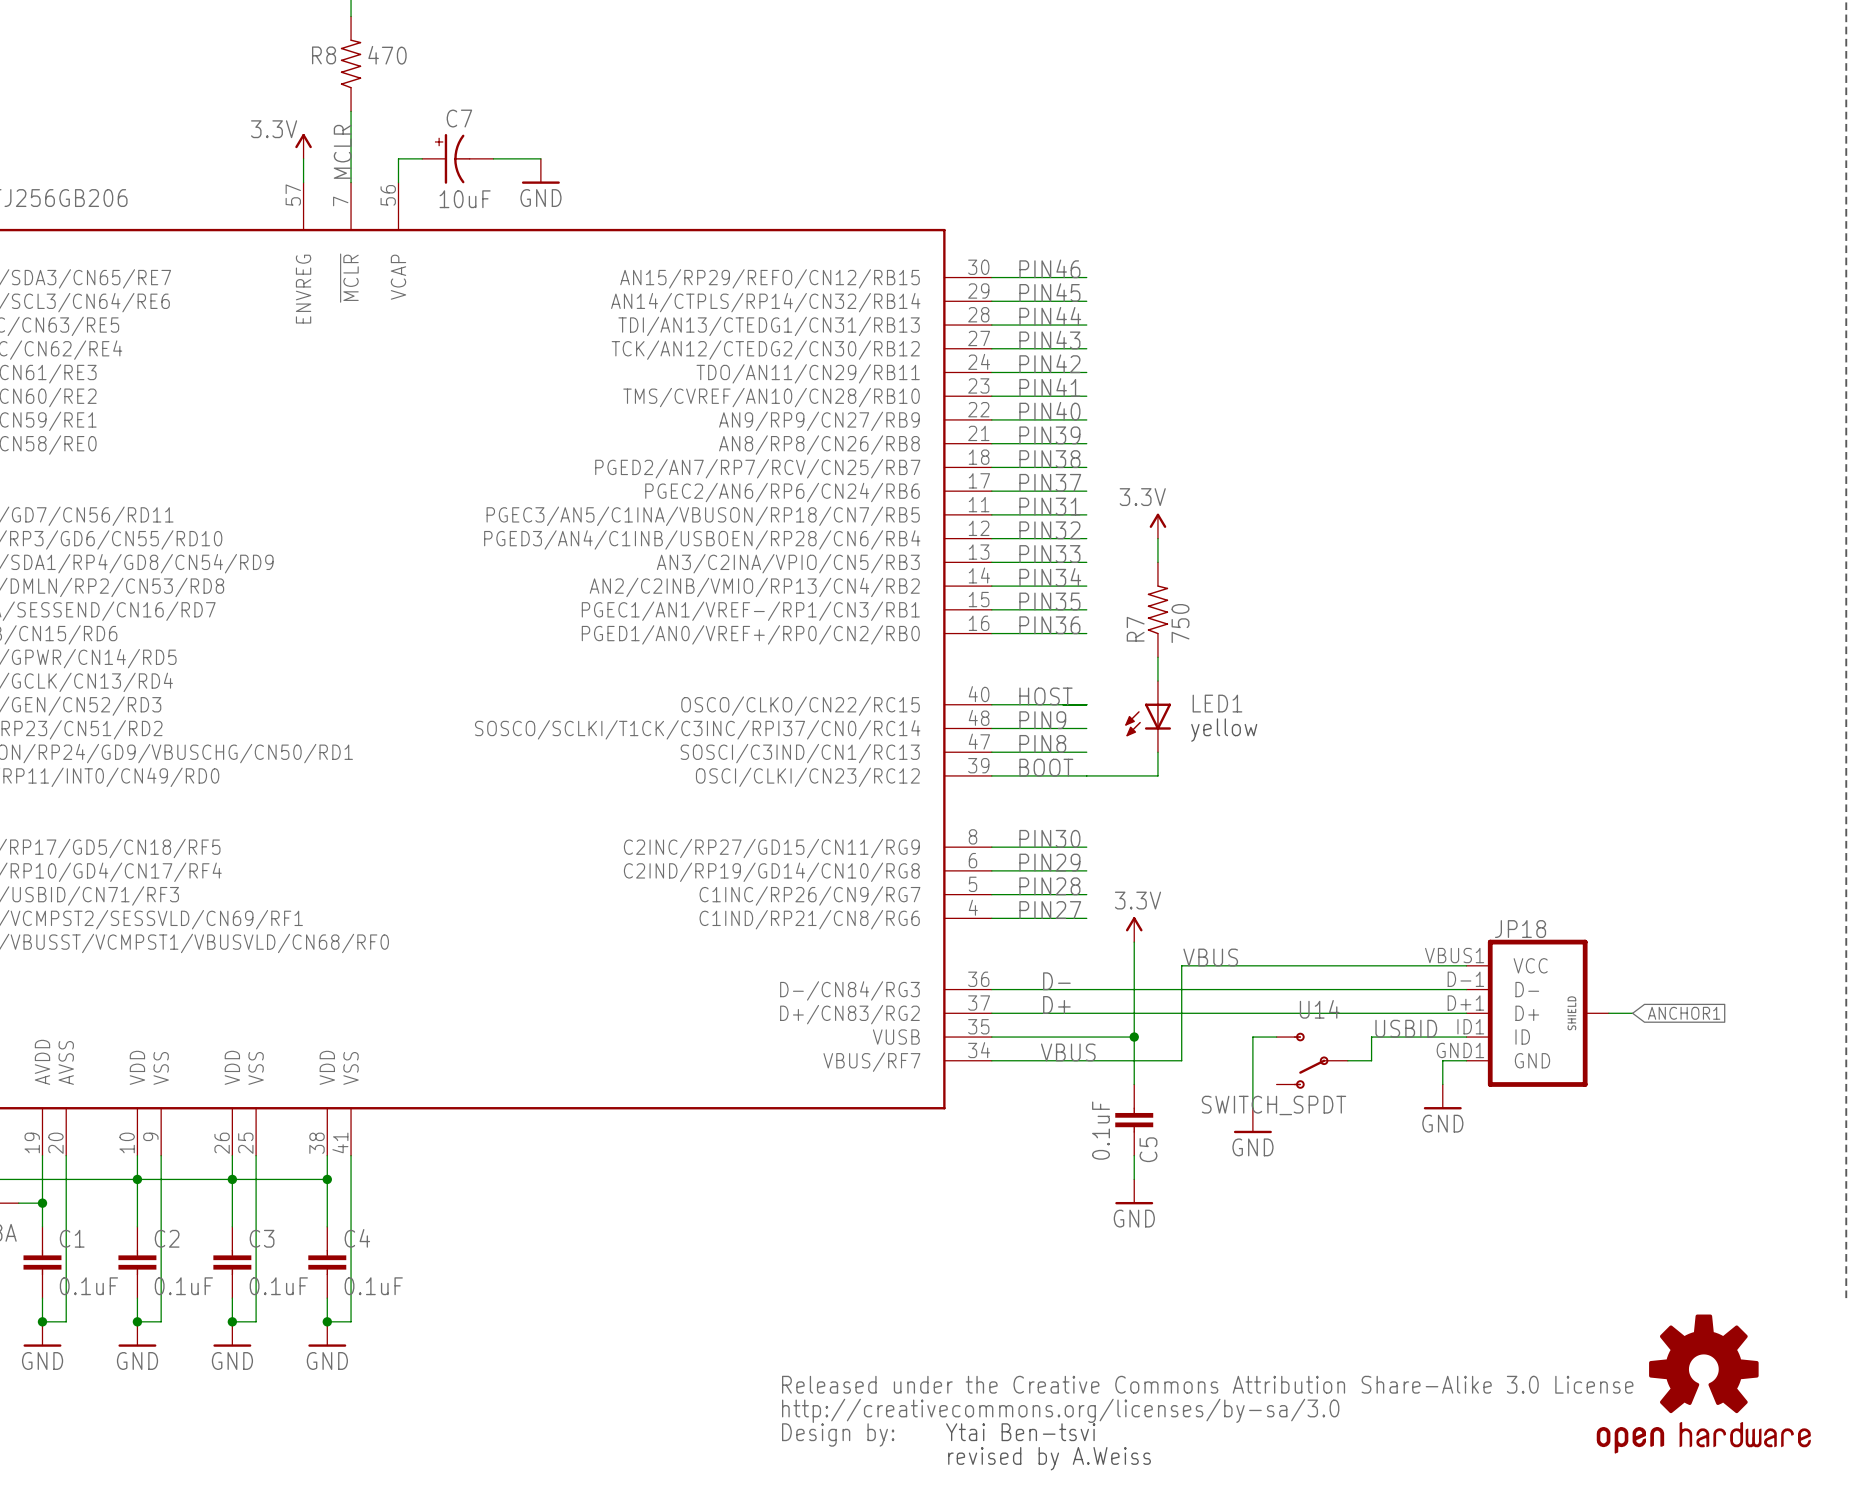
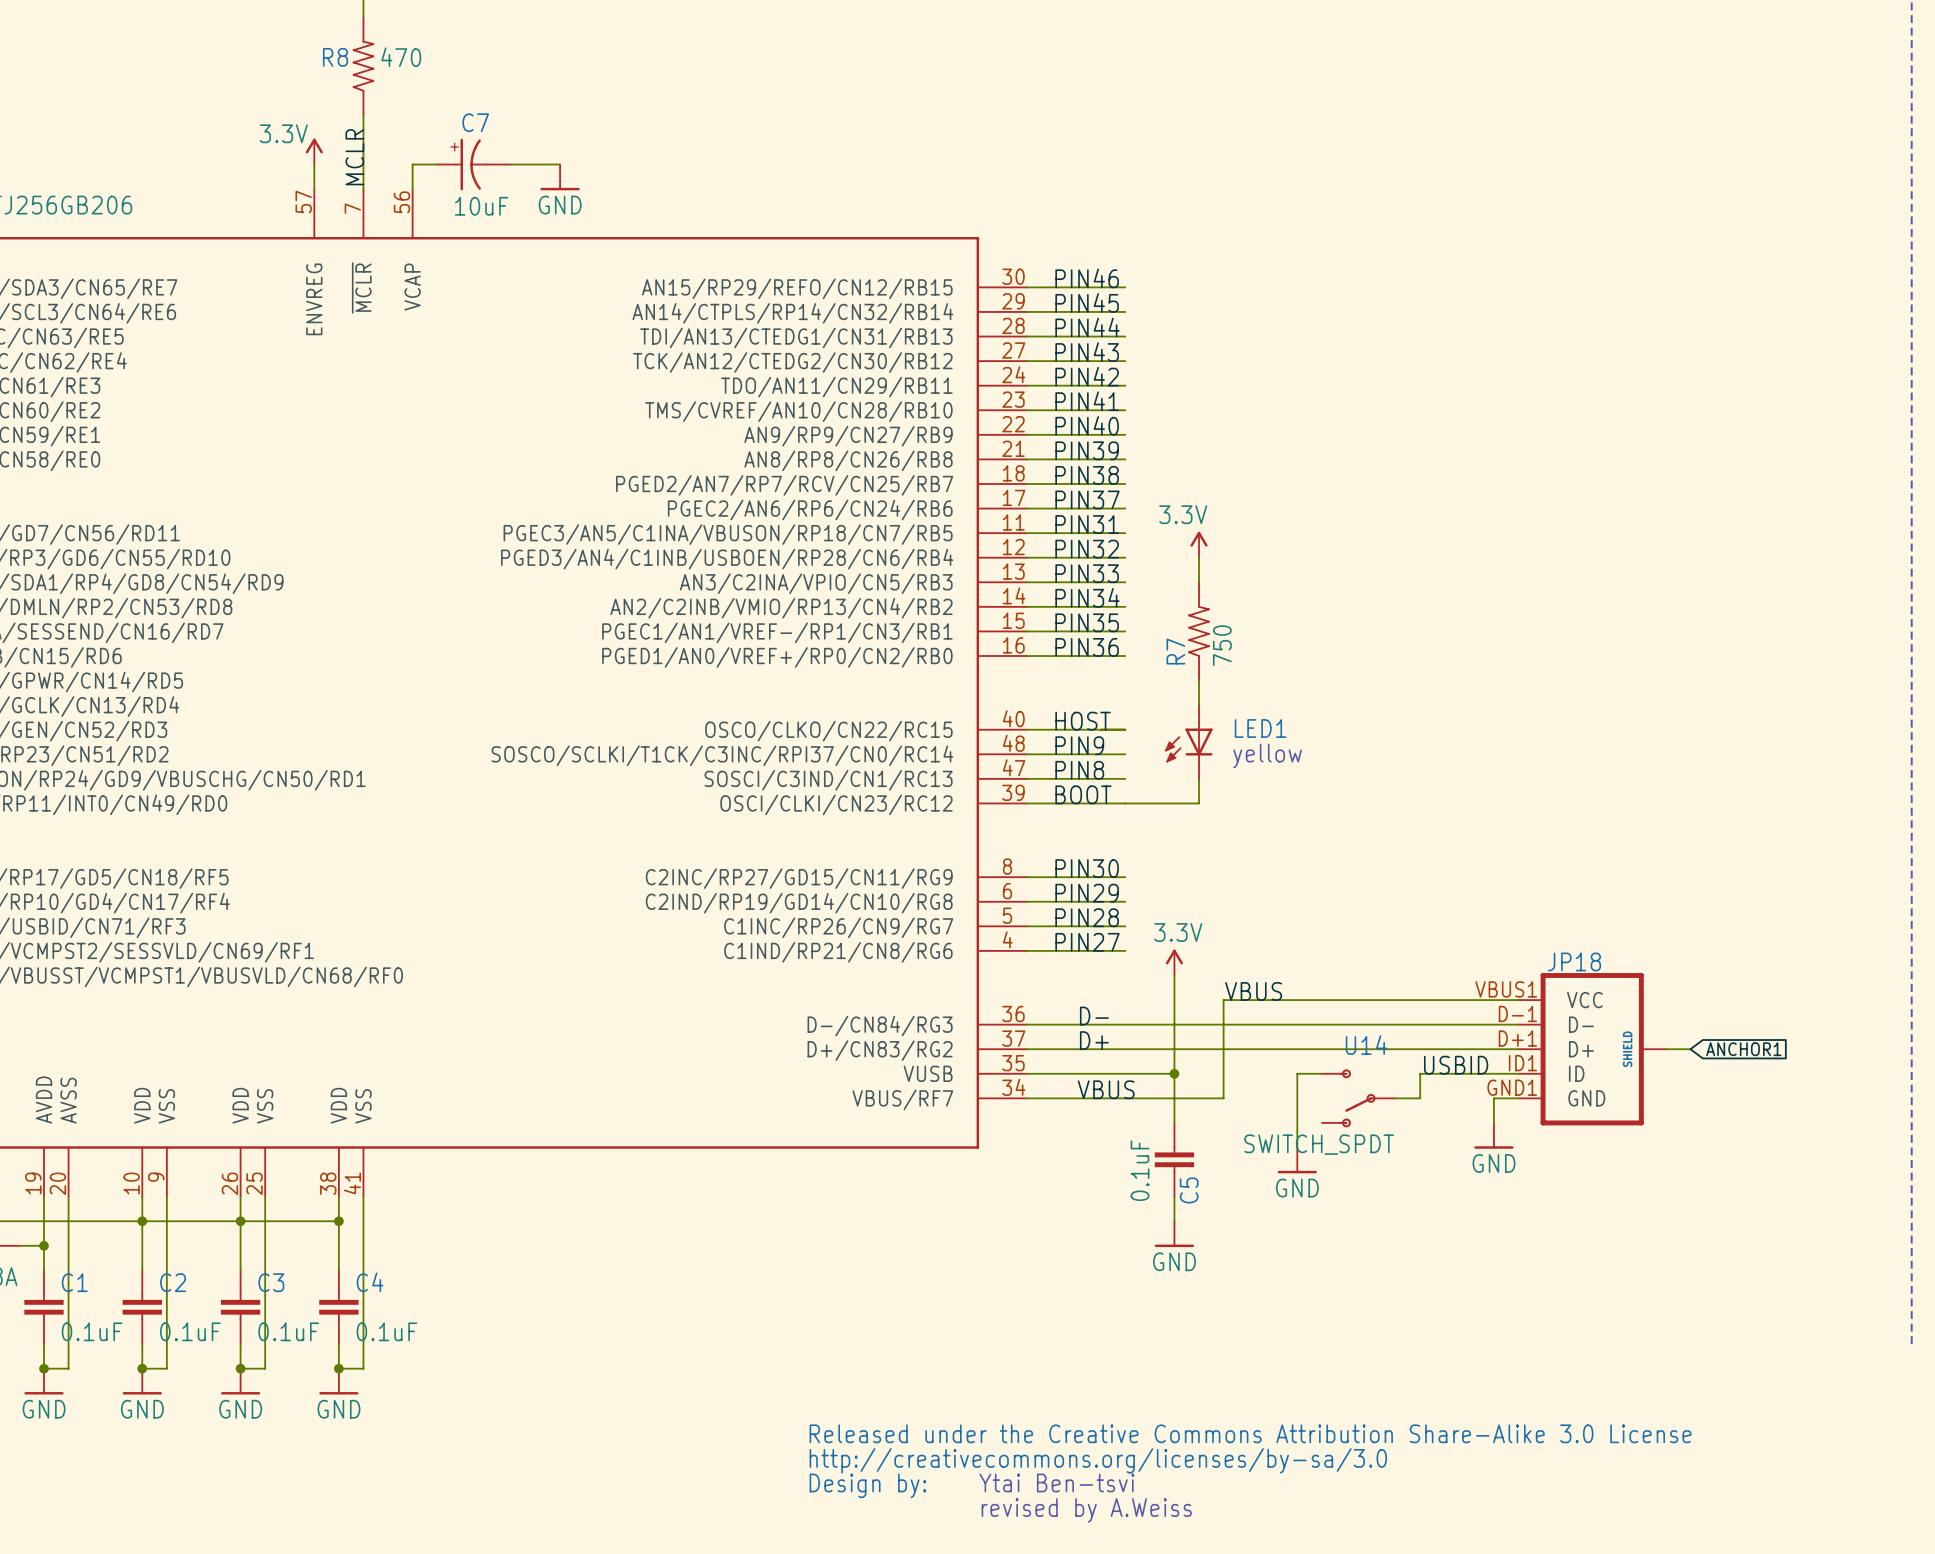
part: (1703, 1384) -> none

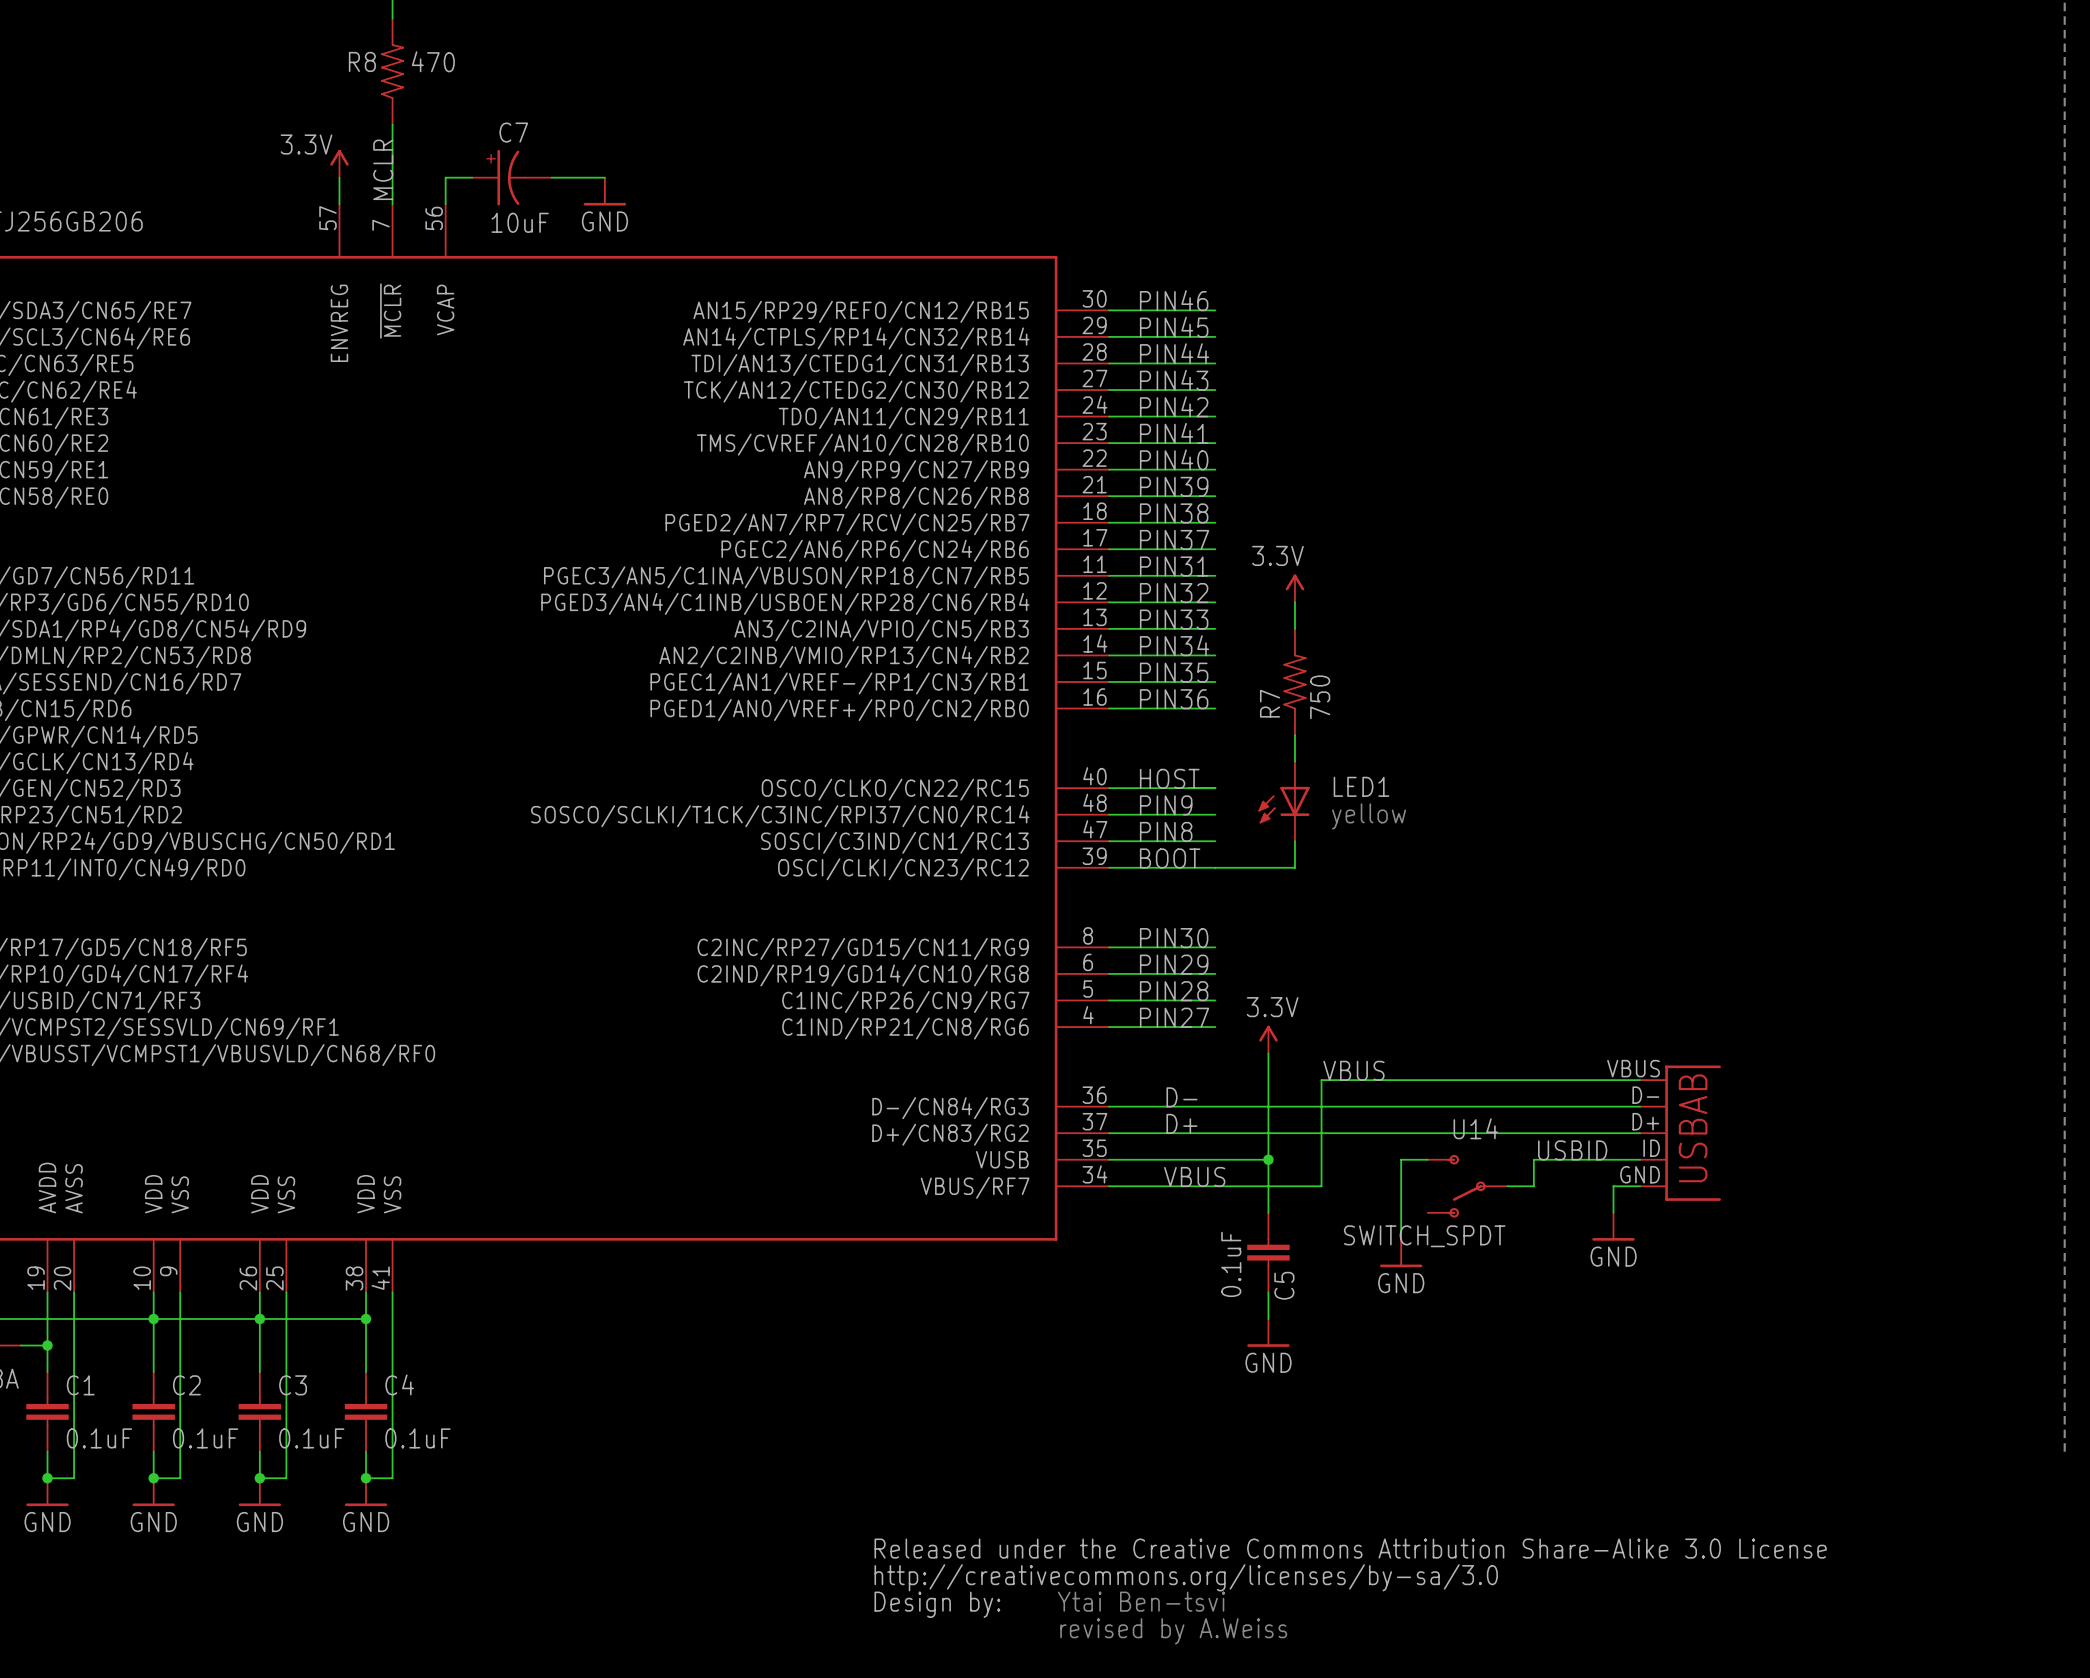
part: none -> (1680, 1133)
JP18: (1592, 1049) -> none
wire: (1665, 1049) (1690, 1049) -> none
global label: ANCHOR1 (1743, 1049) -> none

